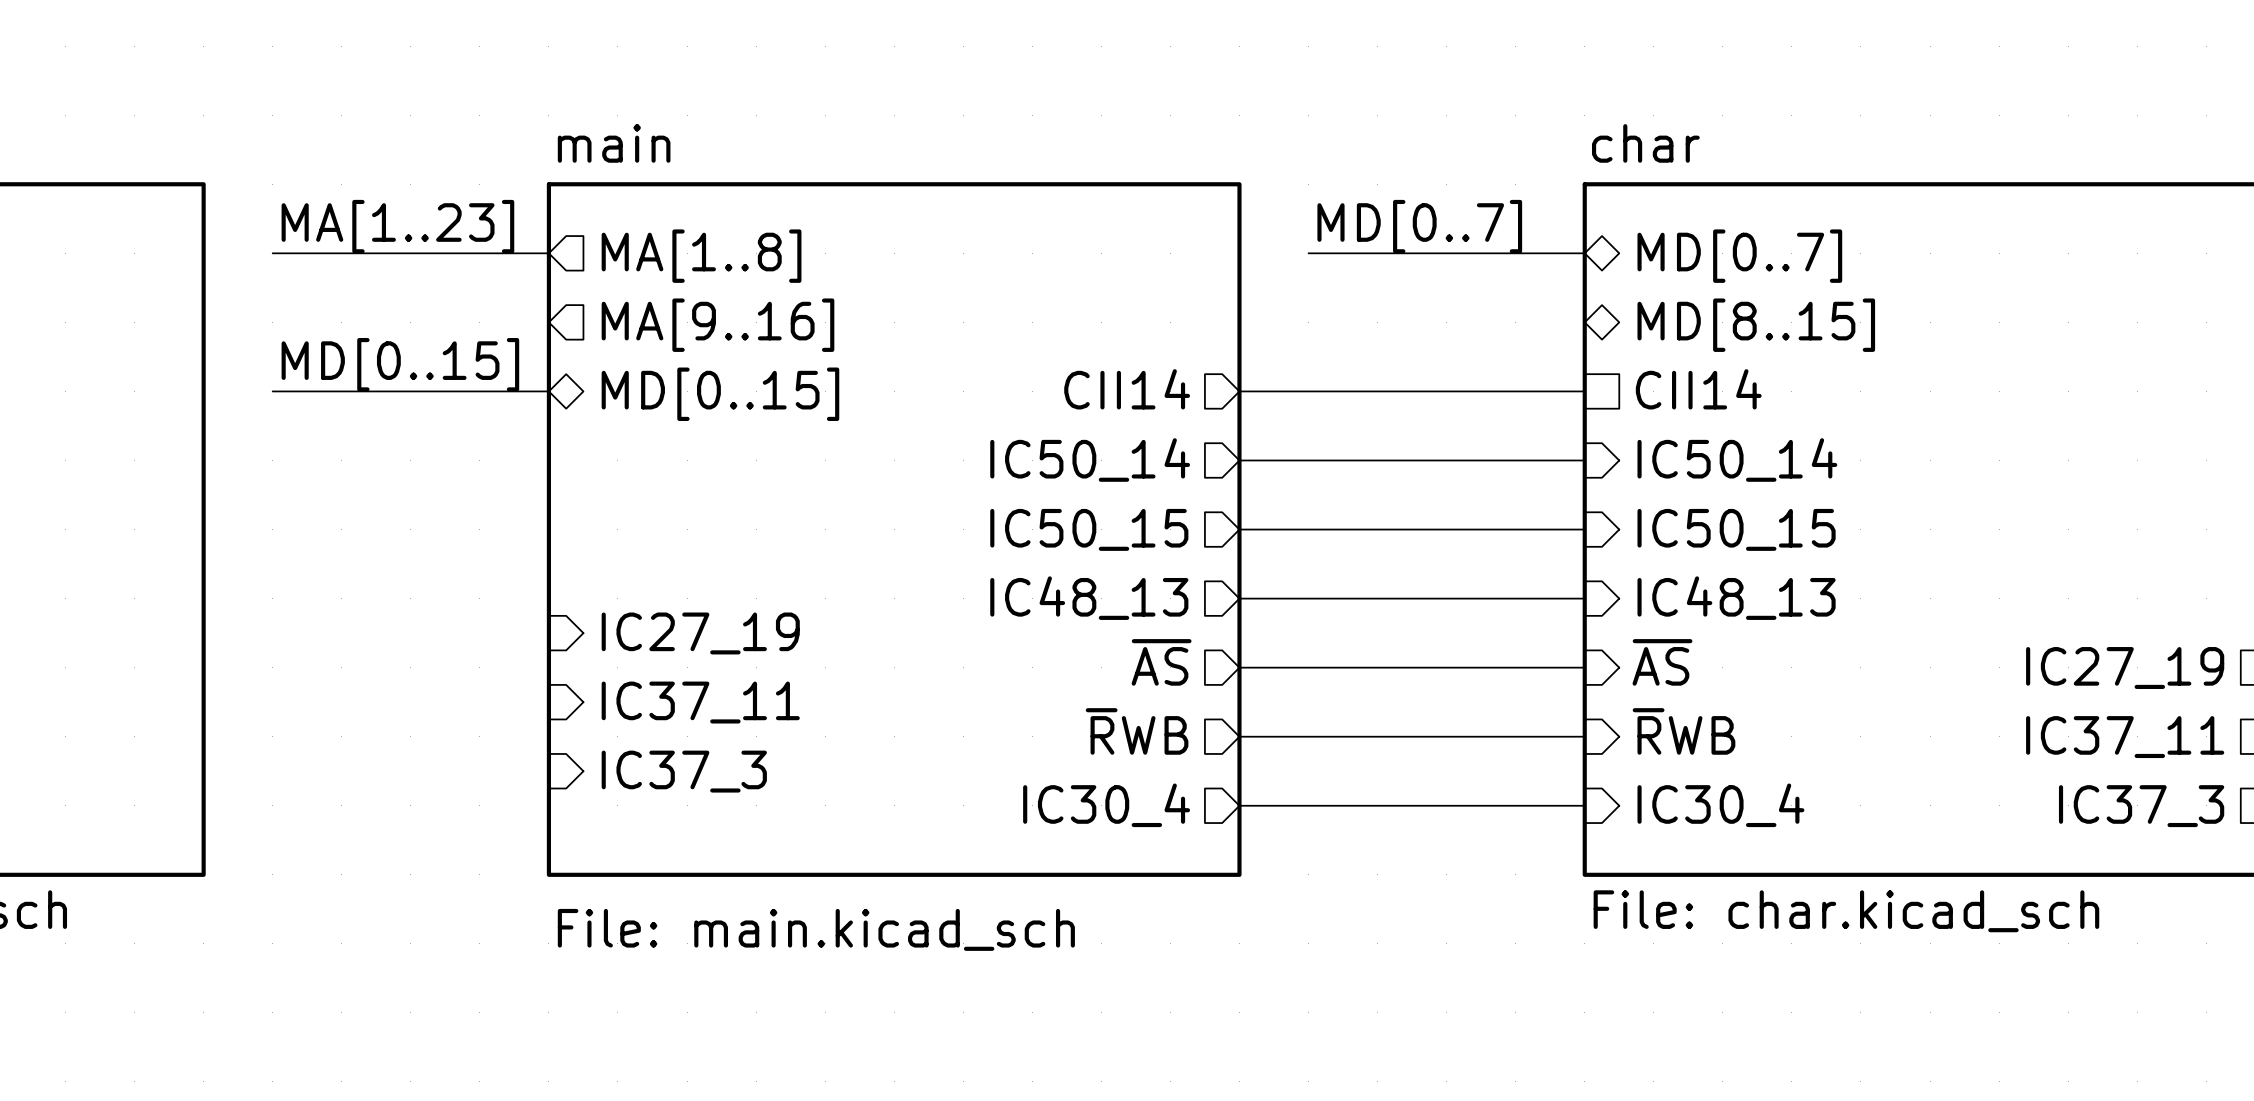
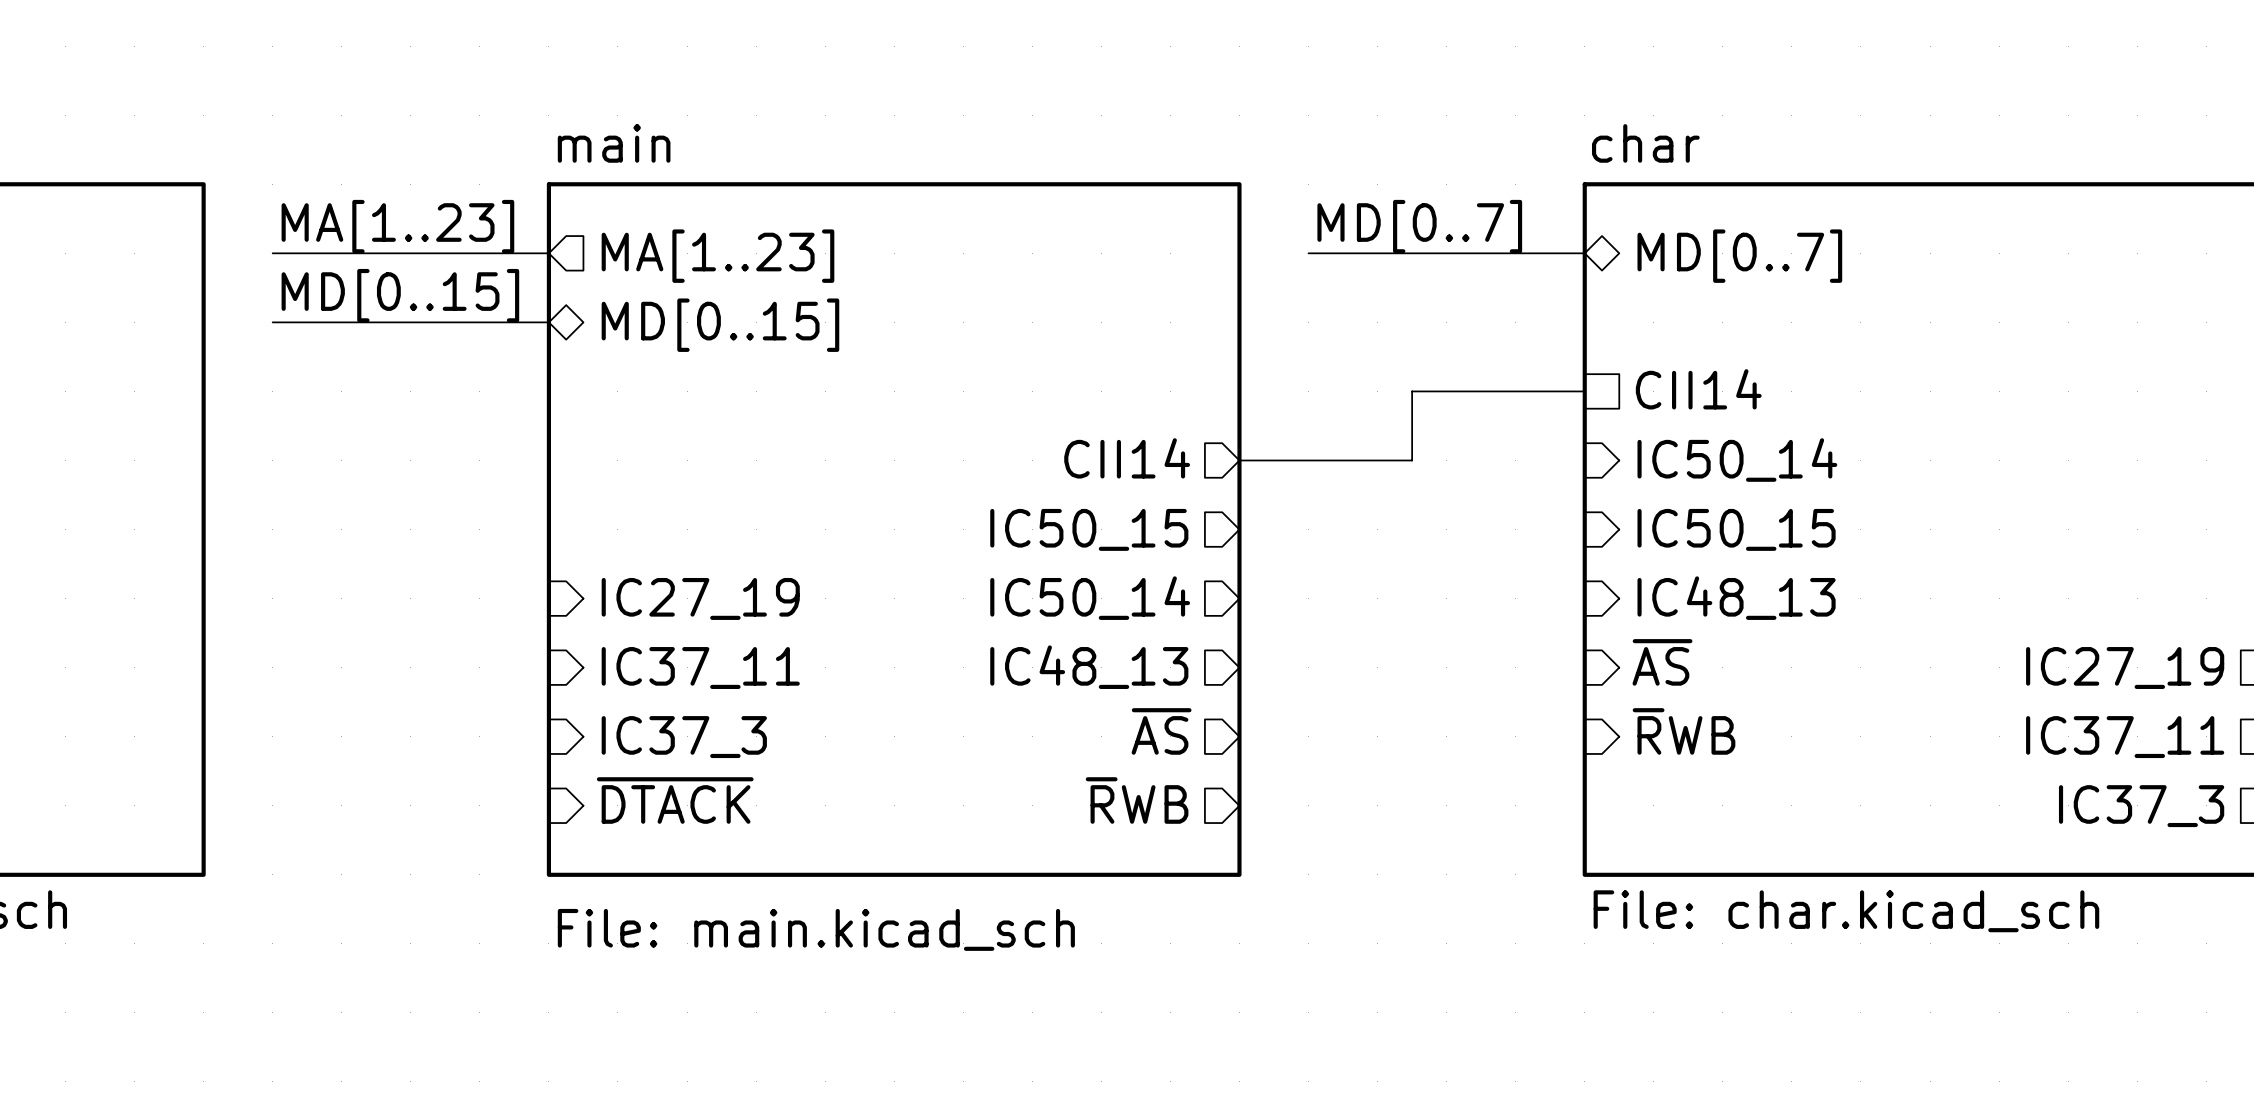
sheet pin: MA[1..8] (701, 256) -> MA[1..23] (717, 256)
sheet pin shape: output (717, 325) -> bidirectional (720, 325)
sheet pin: MA[9..16] (717, 325) -> MD[0..15] (720, 325)
sheet pin: MD[8..15] (1756, 325) -> none
label position: MD[0..15] (400, 364) -> MD[0..15] (400, 295)
sheet pin: CII14 (1127, 389) -> none
bus: (272, 391) (548, 391) -> (272, 322) (548, 322)
wire: (1239, 391) (1412, 391) -> none
sheet pin: MD[0..15] (720, 394) -> none
sheet pin: IC50_14 (1090, 460) -> CII14 (1127, 458)
wire: (1412, 460) (1584, 460) -> (1412, 460) (1412, 391)
wire: (1239, 529) (1584, 529) -> none
sheet pin: IC48_13 (1089, 598) -> IC50_14 (1090, 598)
wire: (1239, 598) (1584, 598) -> none
sheet pin position: IC27_19 (700, 633) -> IC27_19 (700, 598)
sheet pin: ~{AS} (1161, 662) -> IC48_13 (1089, 667)
wire: (1239, 667) (1584, 667) -> none
sheet pin position: IC37_11 (700, 702) -> IC37_11 (700, 668)
sheet pin: ~{R}WB (1137, 731) -> ~{AS} (1161, 731)
wire: (1239, 736) (1584, 736) -> none
sheet pin position: IC37_3 (684, 771) -> IC37_3 (684, 737)
sheet pin: none -> ~{DTACK} (675, 800)
sheet pin: IC30_4 (1106, 805) -> ~{R}WB (1137, 800)
wire: (1239, 805) (1584, 805) -> none
sheet pin: IC30_4 (1720, 805) -> none

